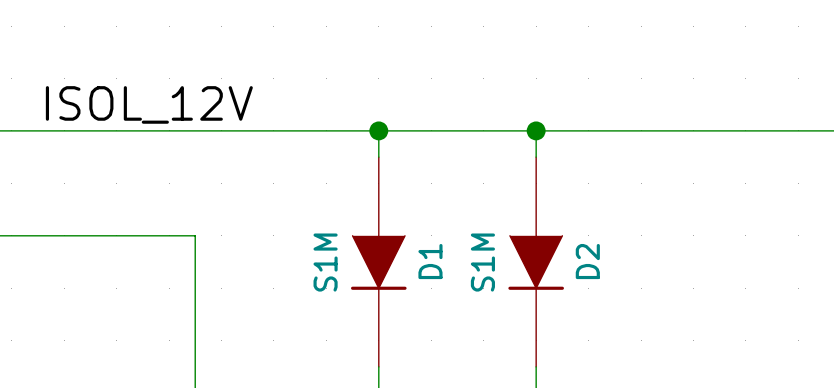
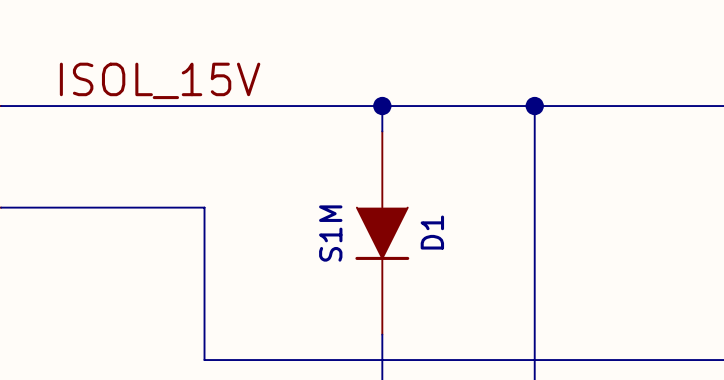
label: ISOL_12V (149, 104) -> ISOL_15V (160, 80)
D2: S1M (536, 262) -> none

